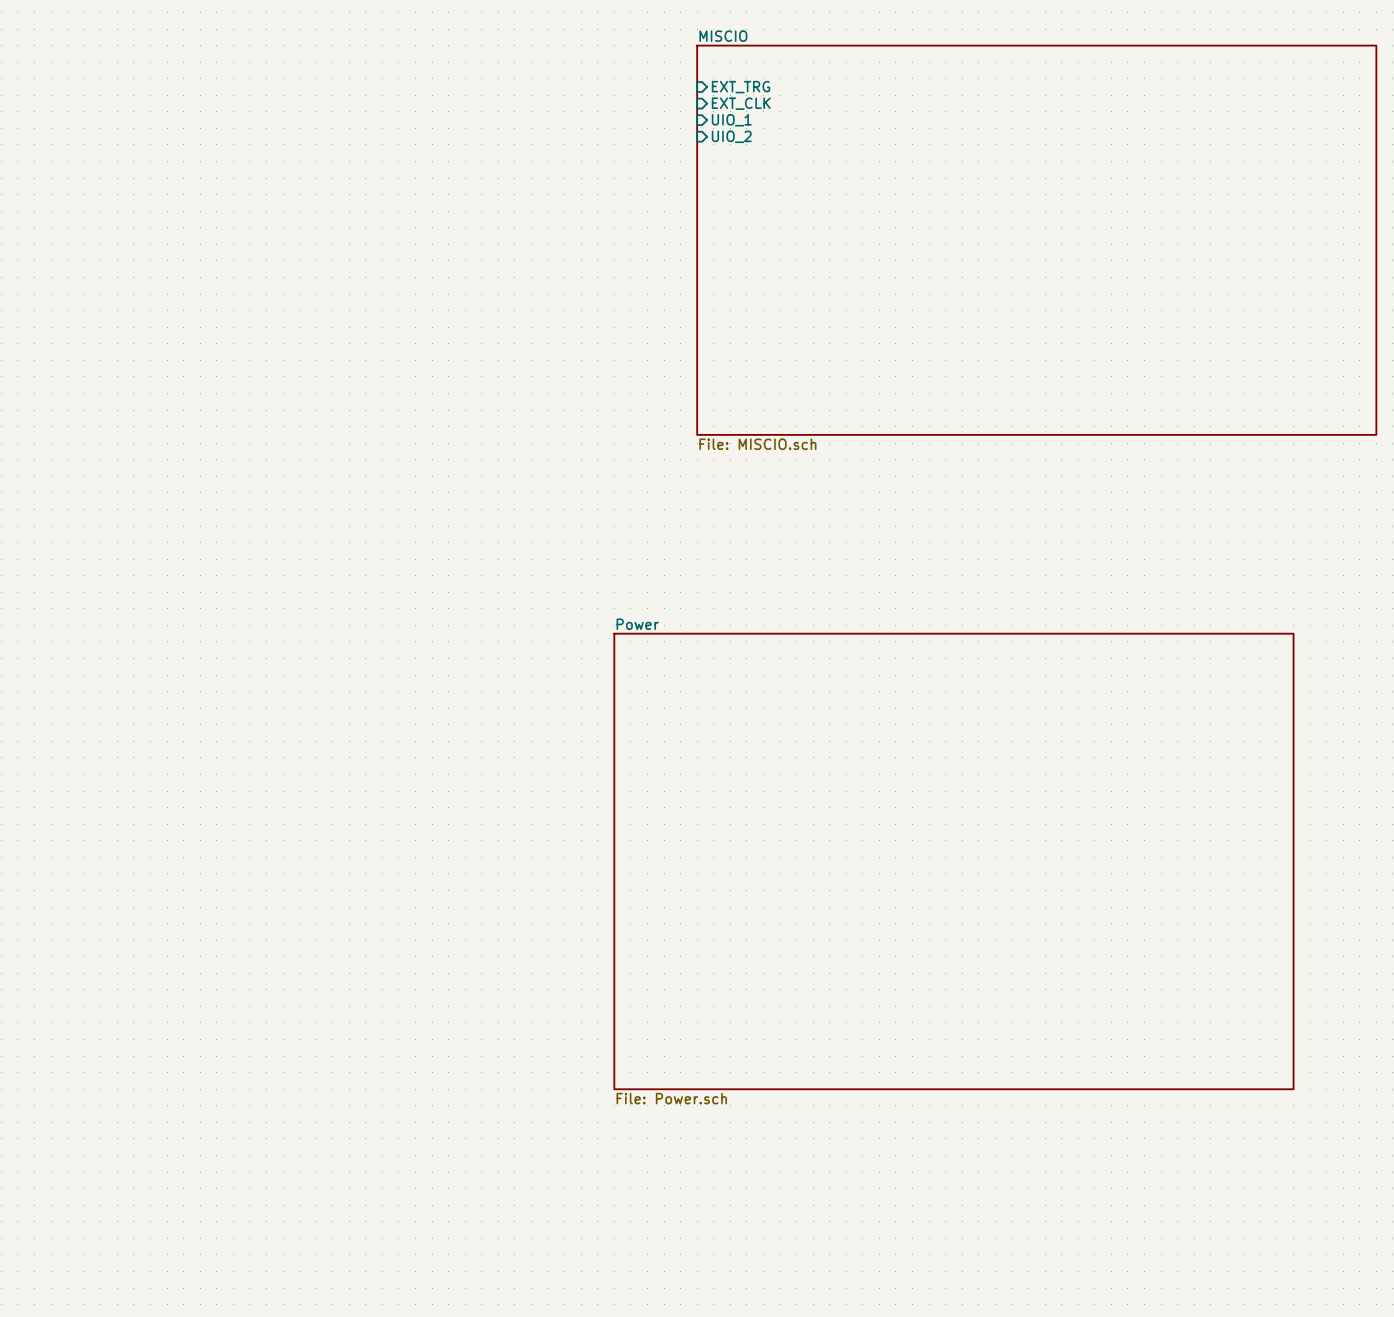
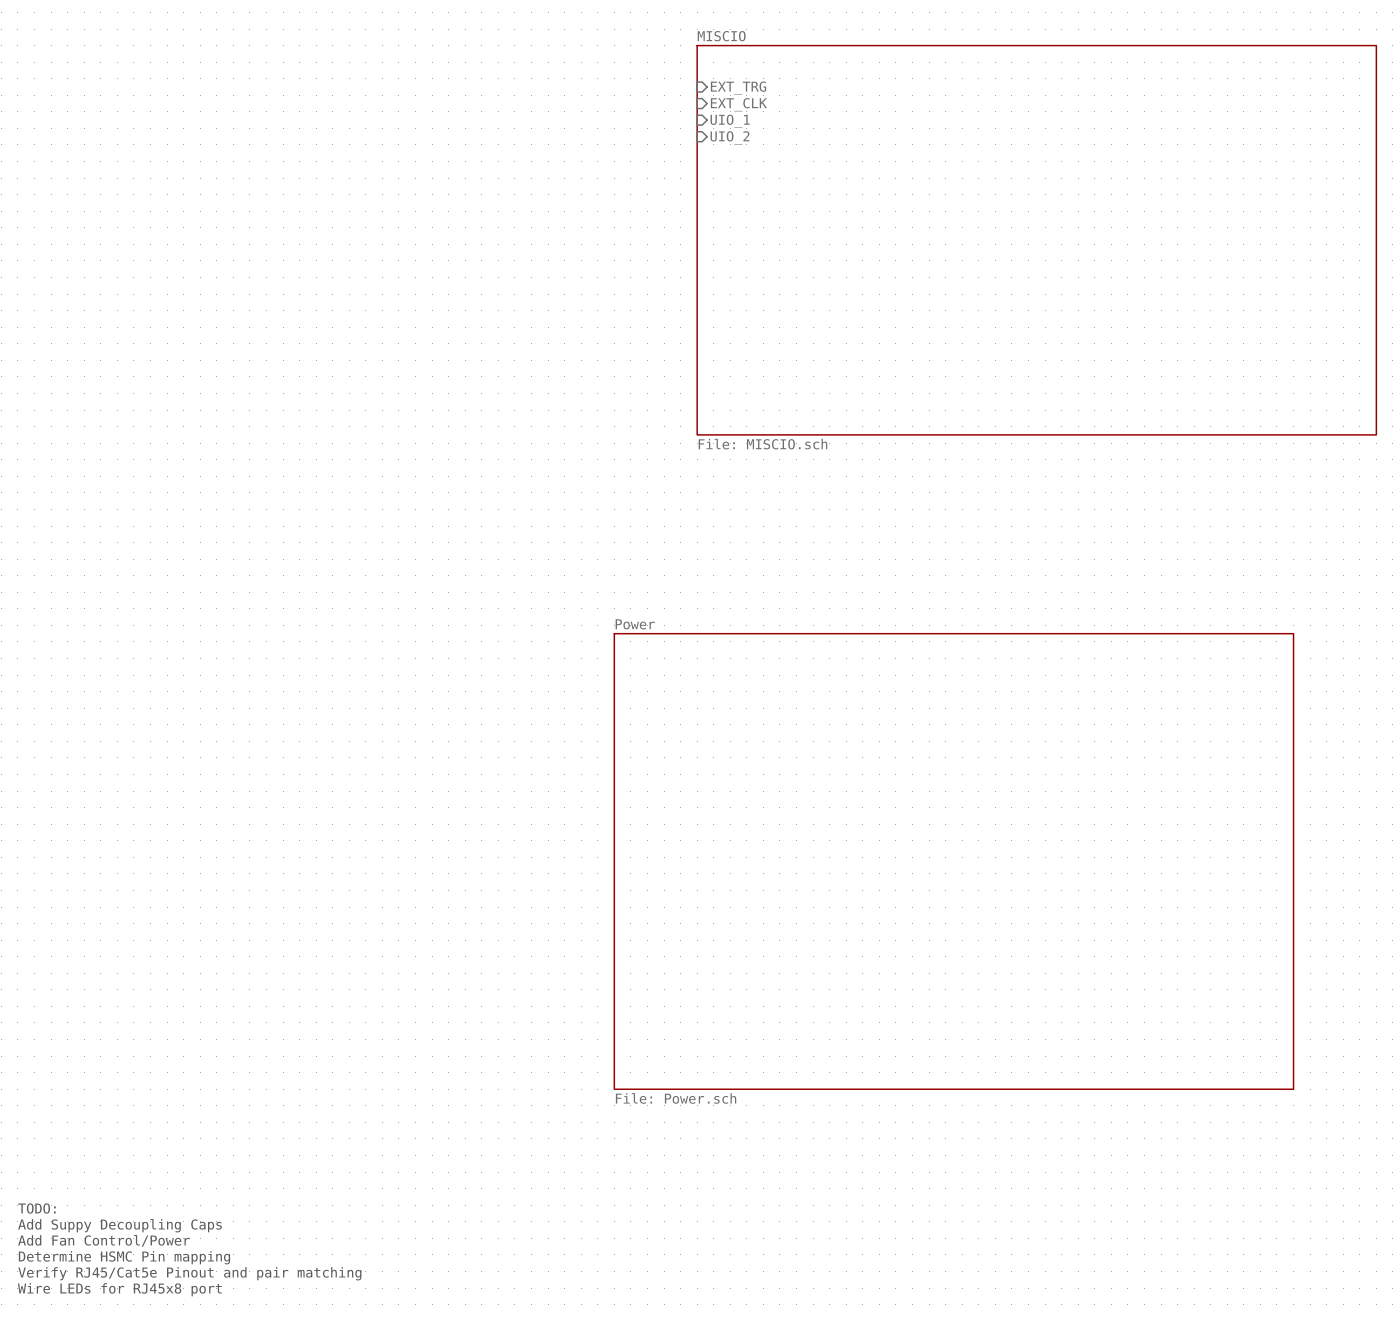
text: none -> TODO: (36, 1208)
text: none -> Add Suppy Decoupling Caps (120, 1225)
text: none -> Add Fan Control/Power (104, 1240)
text: none -> Determine HSMC Pin mapping (124, 1257)
text: none -> Verify RJ45/Cat5e Pinout and pair matching (189, 1273)
text: none -> Wire LEDs for RJ45x8 port (119, 1289)

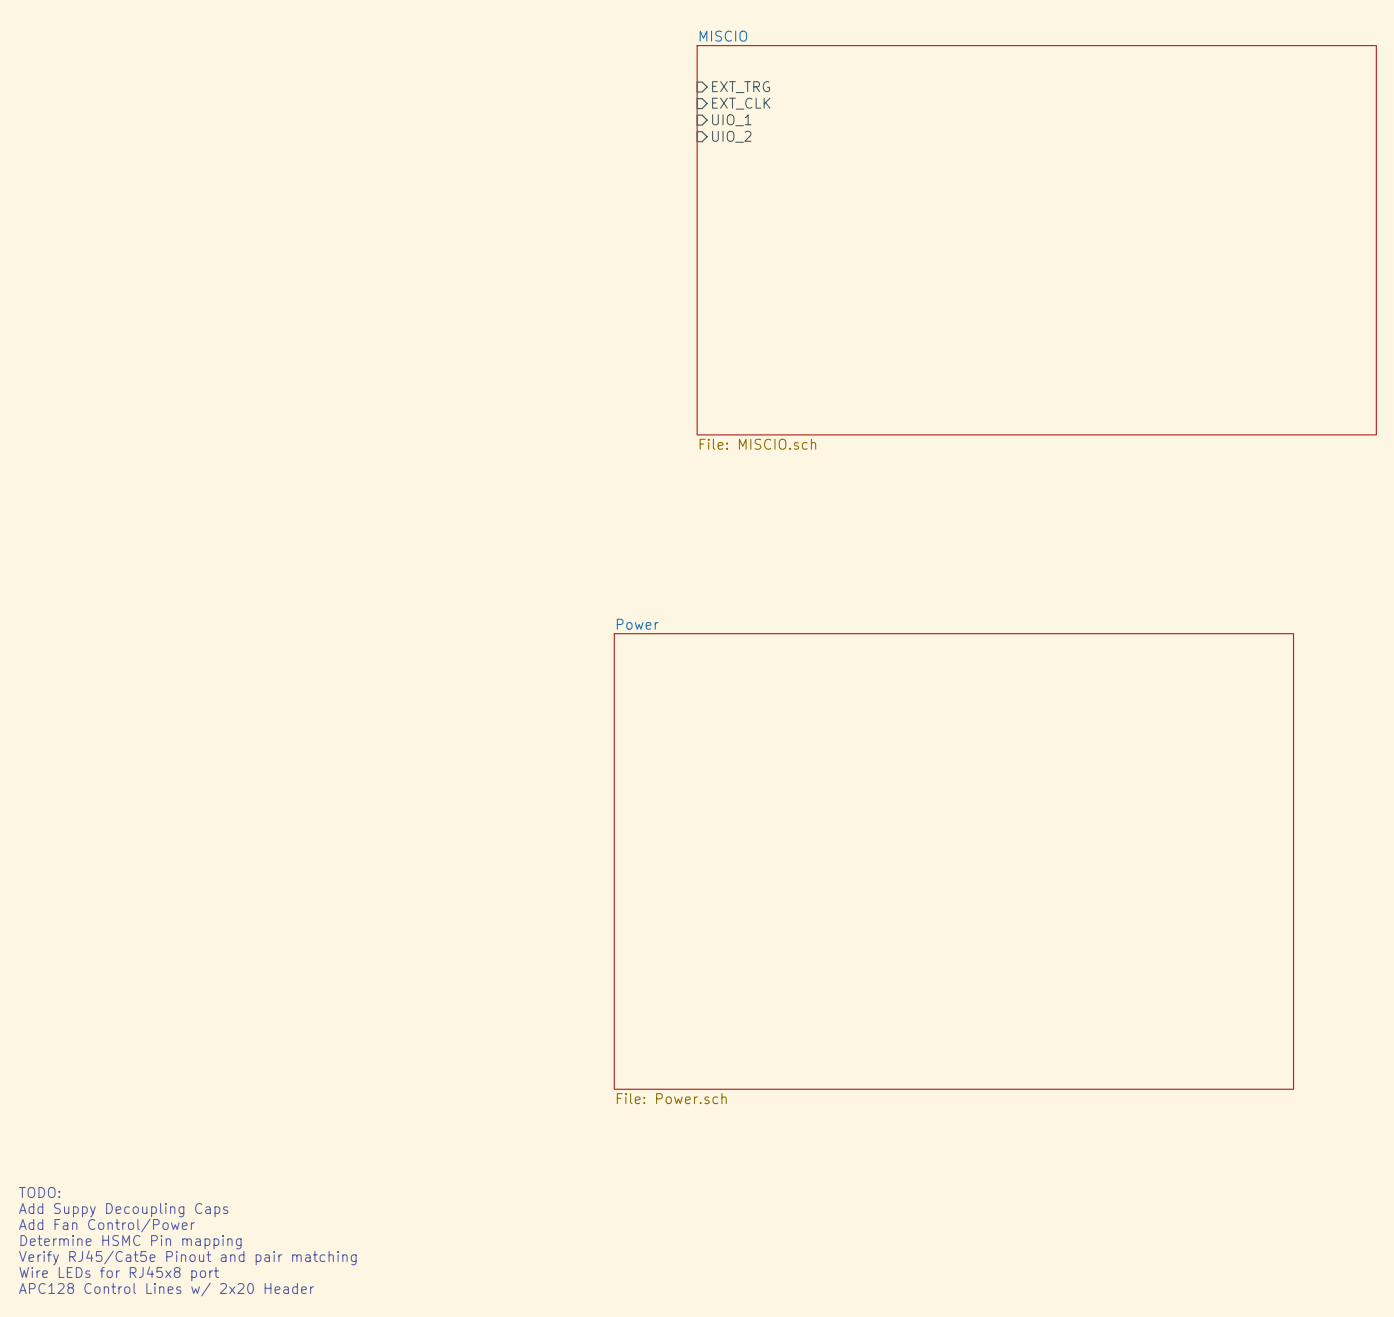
text: none -> TODO: (39, 1192)
text: TODO: (36, 1208) -> Add Suppy Decoupling Caps (123, 1210)
text: Add Suppy Decoupling Caps (120, 1225) -> Add Fan Control/Power (106, 1225)
text: Add Fan Control/Power (104, 1240) -> Determine HSMC Pin mapping (131, 1242)
text: Determine HSMC Pin mapping (124, 1257) -> Verify RJ45/Cat5e Pinout and pair matching (187, 1257)
text: Verify RJ45/Cat5e Pinout and pair matching (189, 1273) -> Wire LEDs for RJ45x8 port (119, 1273)
text: Wire LEDs for RJ45x8 port (119, 1289) -> APC128 Control Lines w/ 2x20 Header (166, 1289)

